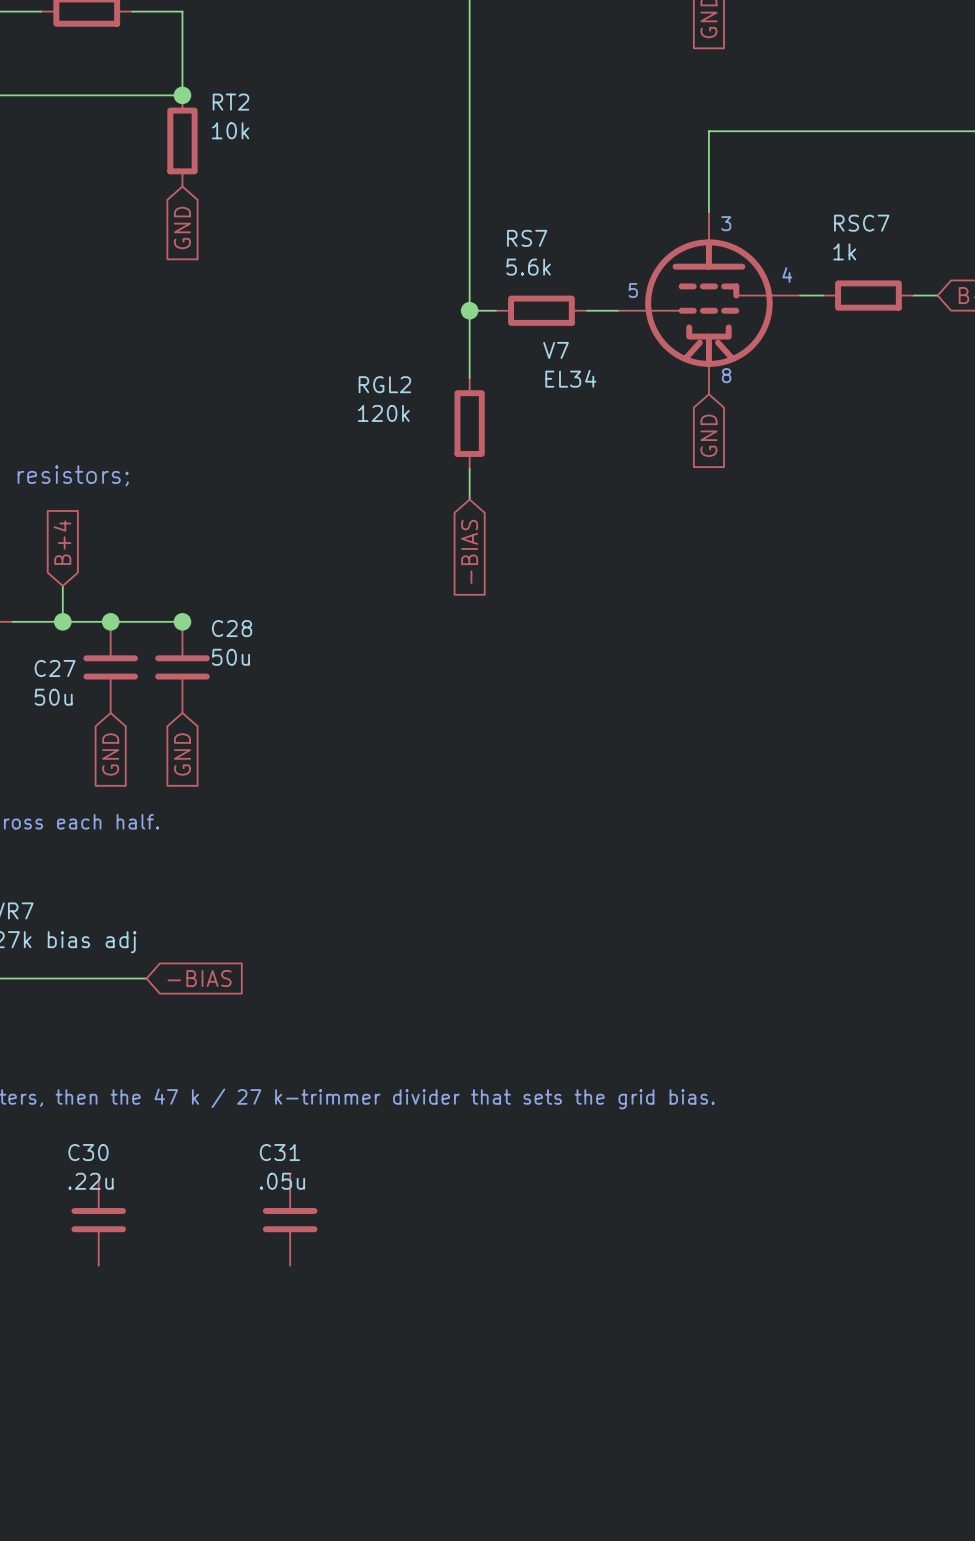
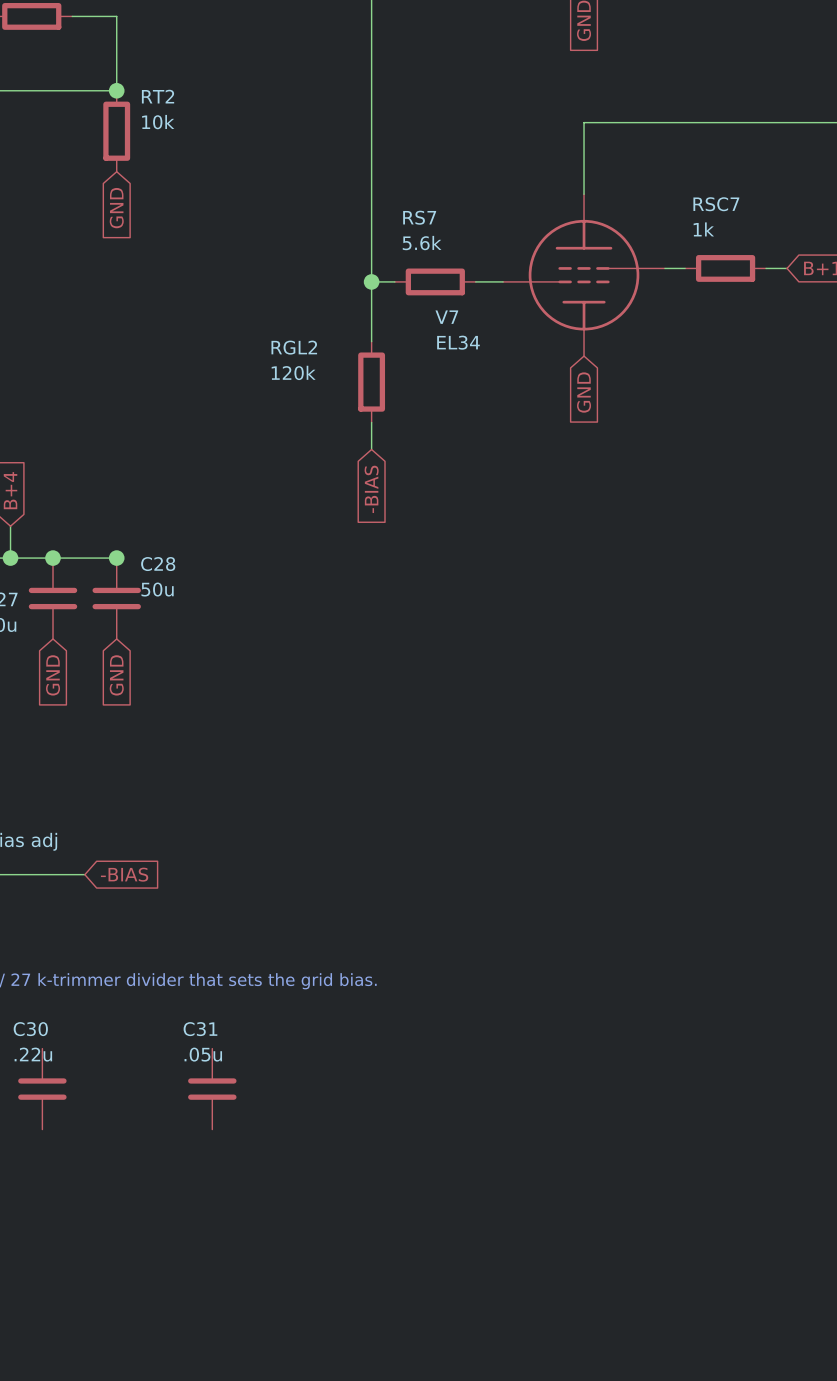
V7 symbol: [617, 211, 801, 395] -> [503, 194, 665, 357]
text: 3 (726, 223) -> none
text: 4 (787, 274) -> none
text: 5 (633, 290) -> none
text: 8 (726, 375) -> none

